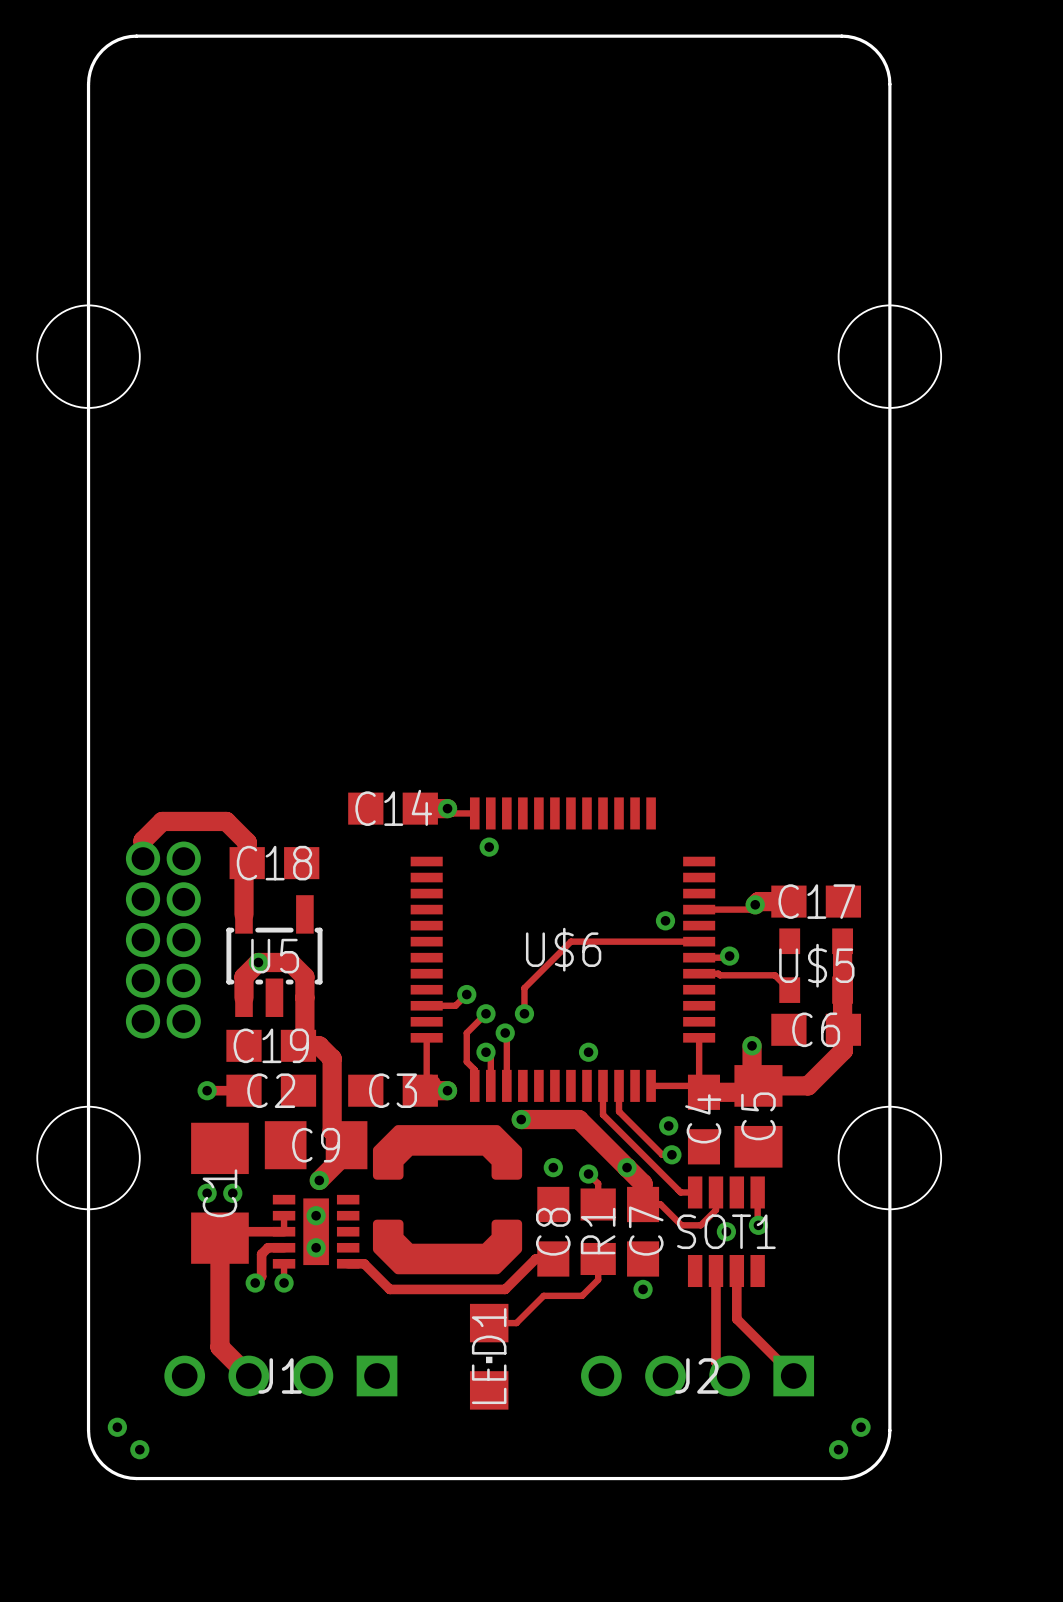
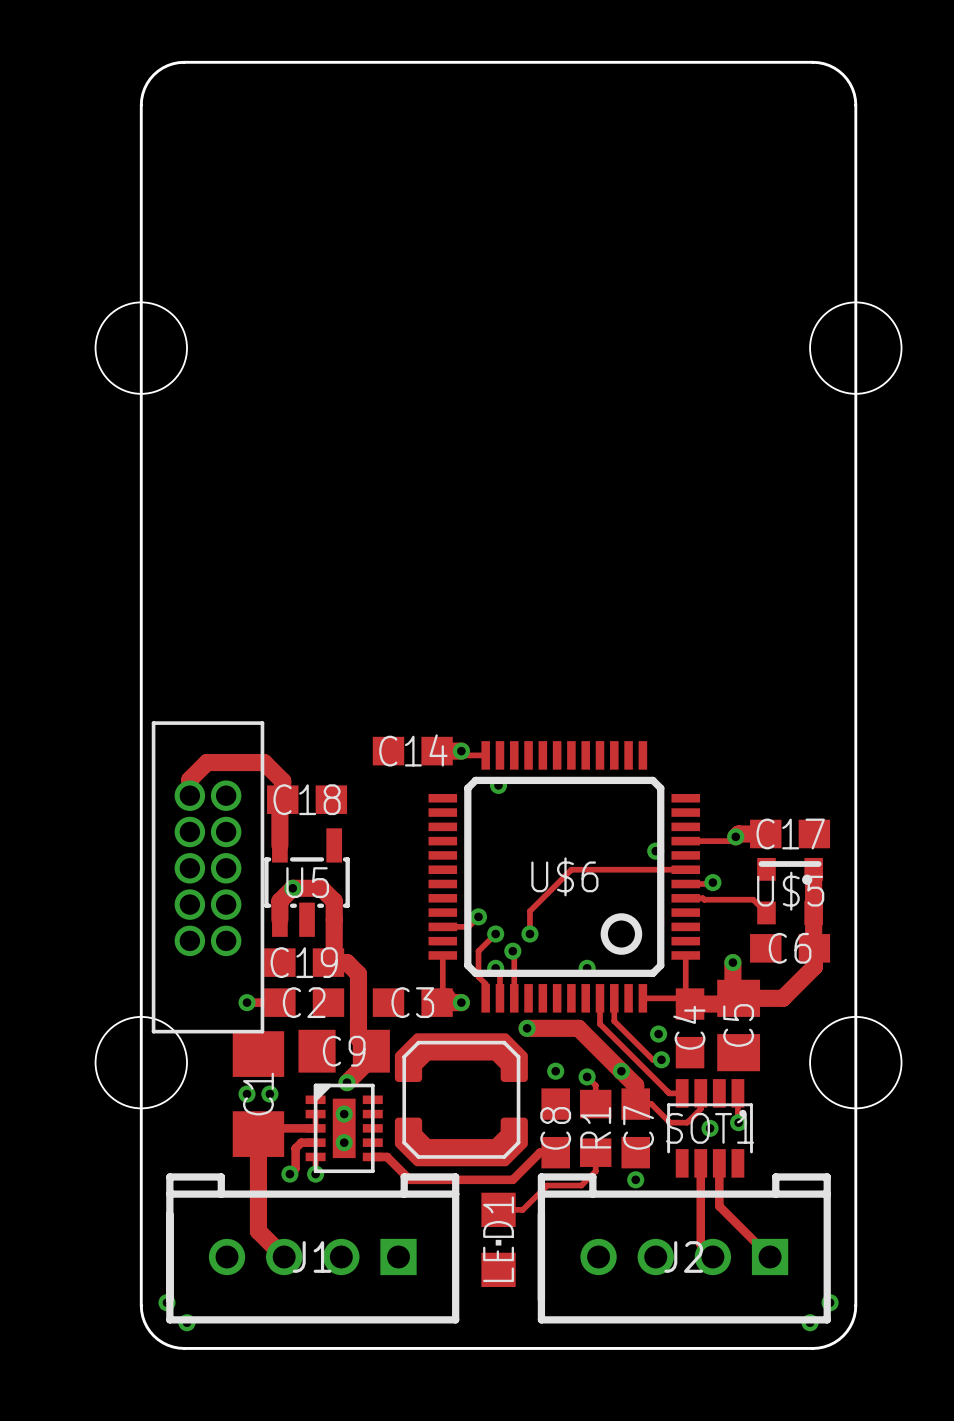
U$6 footprint: [410, 797, 716, 1102] -> [428, 741, 701, 1013]
part footprint: [125, 841, 201, 1039] -> [151, 721, 265, 1034]
U$5 footprint: [779, 928, 854, 1004] -> [757, 857, 823, 926]
part footprint: [372, 1125, 523, 1275] -> [394, 1033, 528, 1167]
SOT1 footprint: [687, 1176, 765, 1288] -> [667, 1079, 753, 1178]
part footprint: [272, 1194, 360, 1269] -> [305, 1083, 383, 1174]
J1 footprint: [164, 1355, 398, 1397] -> [166, 1173, 460, 1324]
J2 footprint: [581, 1355, 815, 1397] -> [537, 1173, 831, 1324]

